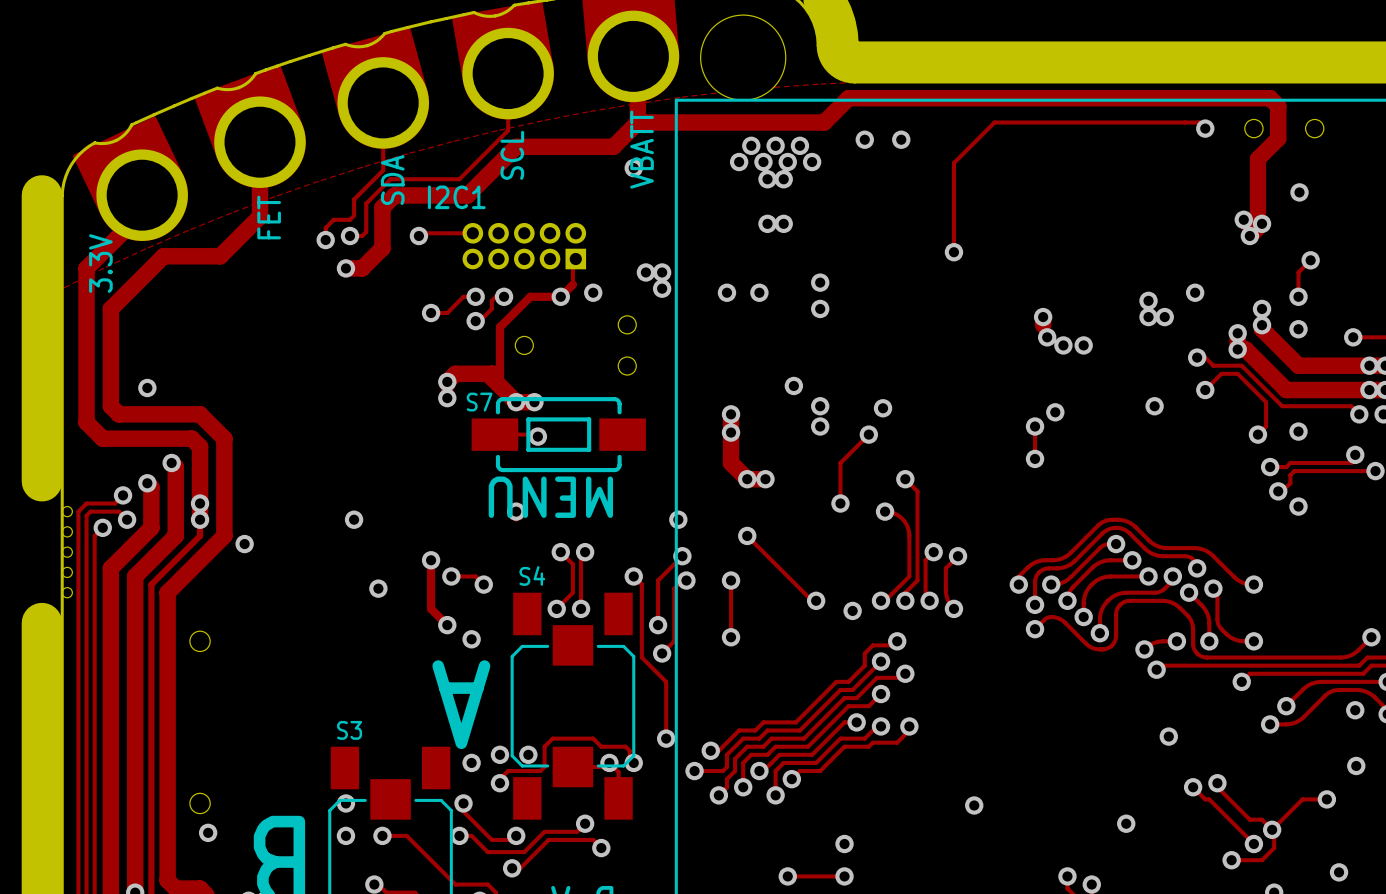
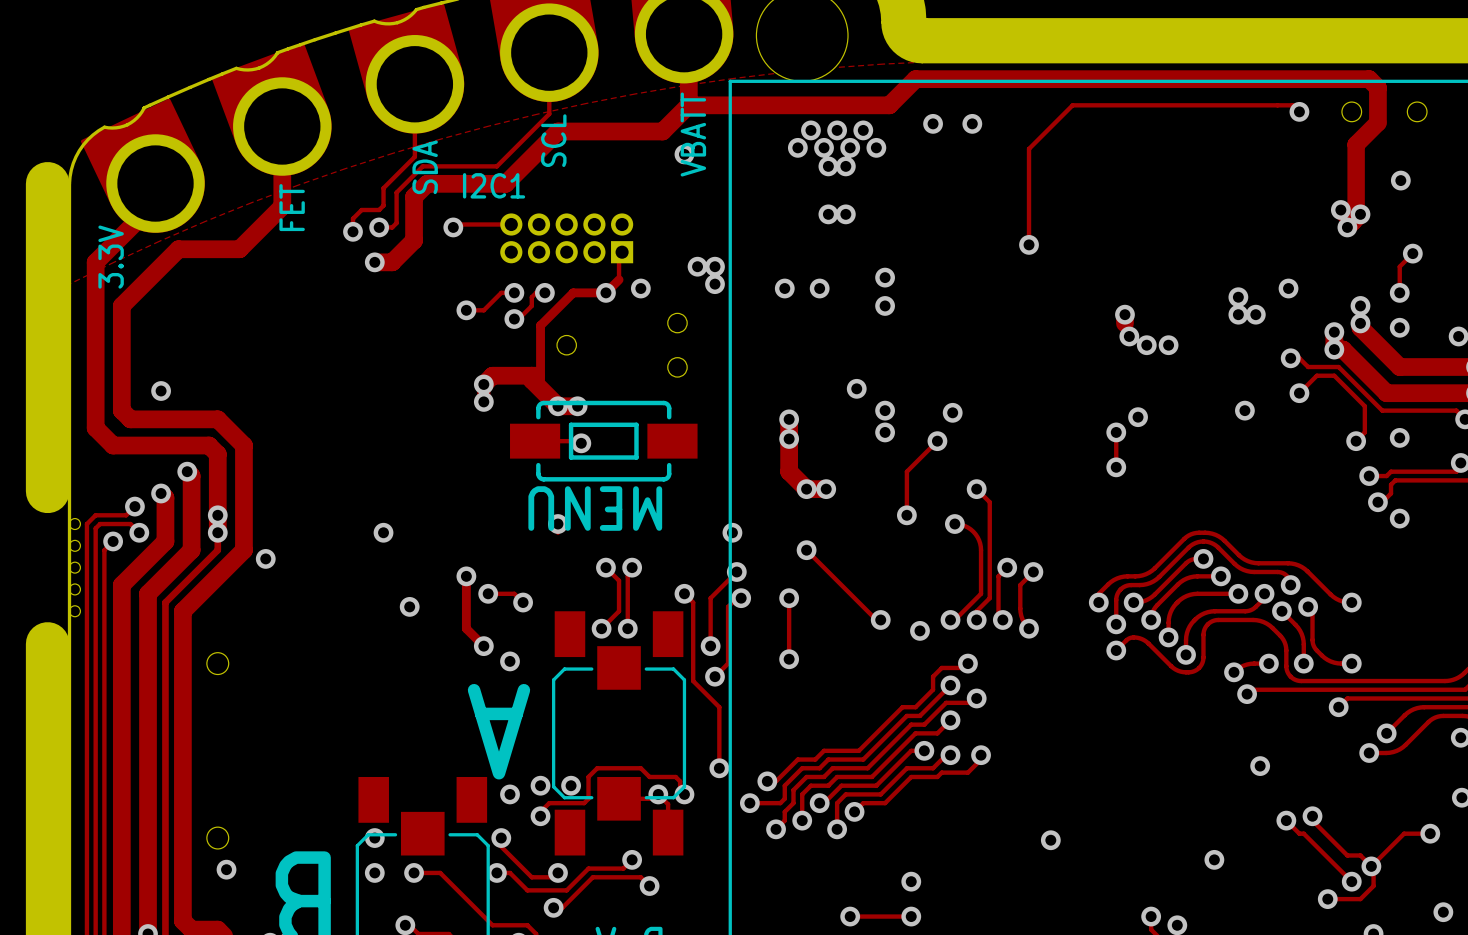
S7 name: S7 (479, 402) -> none
S4 name: S4 (532, 575) -> none
S3 name: S3 (349, 730) -> none

